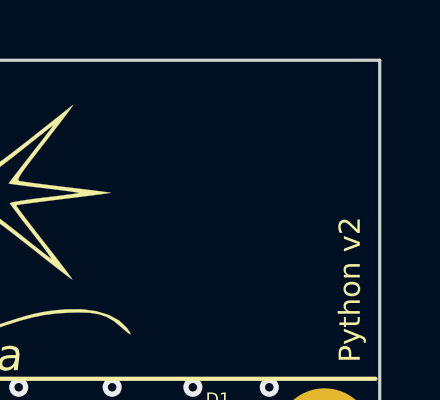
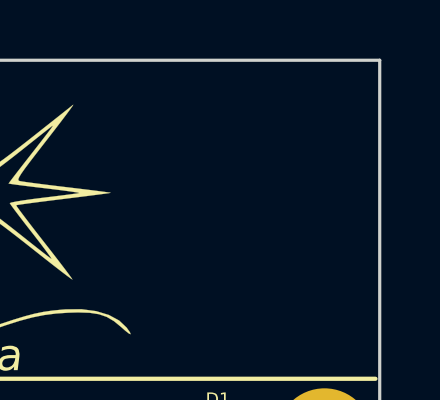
text: Python v2 (351, 289) -> none
via: (18, 387) -> none
via: (112, 387) -> none
via: (192, 387) -> none
via: (269, 387) -> none

